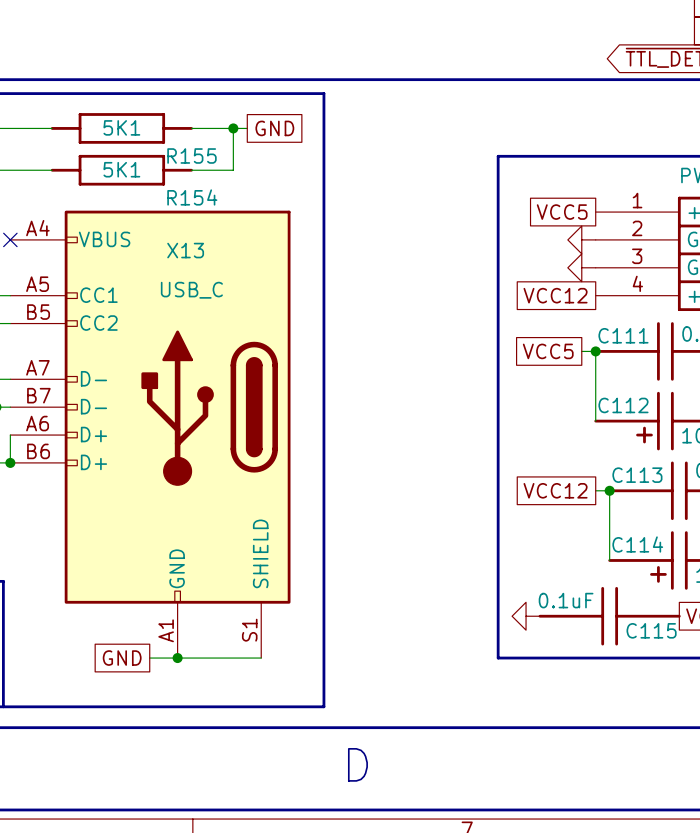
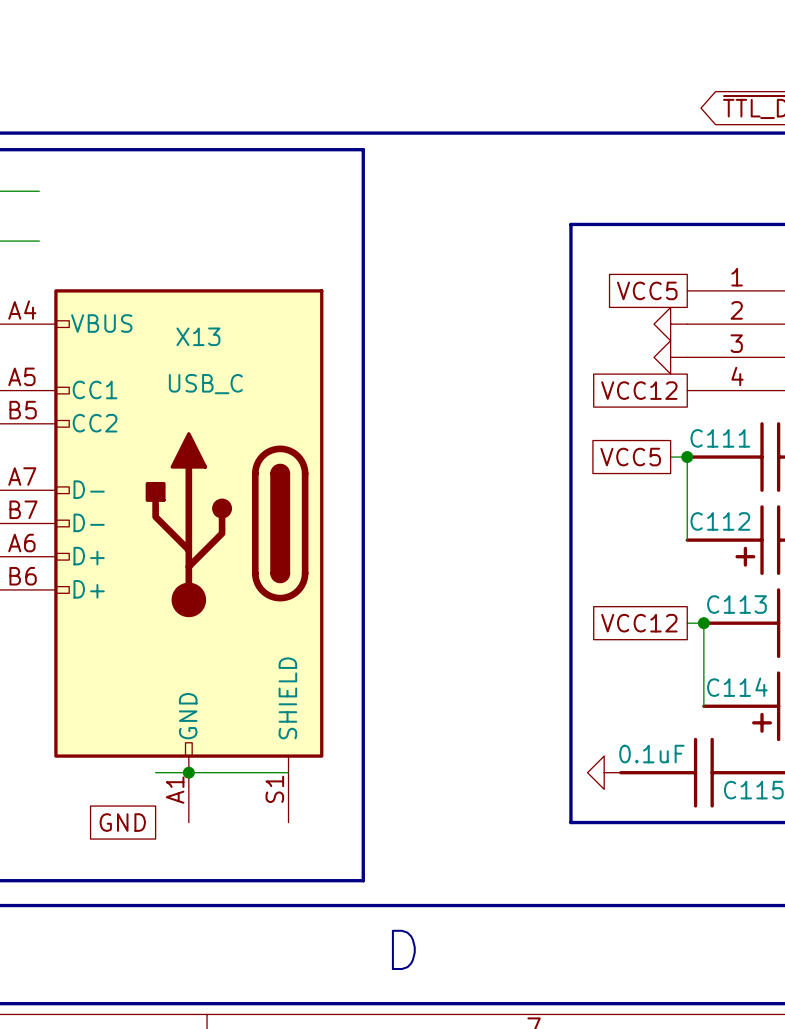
R155: 5K1 (121, 128) -> none
wire: (191, 128) (247, 128) -> none
wire: (233, 128) (233, 170) (191, 170) -> none
junction: (233, 128) -> none
global label: GND (274, 128) -> none
R154: 5K1 (121, 170) -> none
wire: (149, 658) (261, 658) -> (155, 772) (288, 772)
junction position: (177, 658) -> (188, 772)

